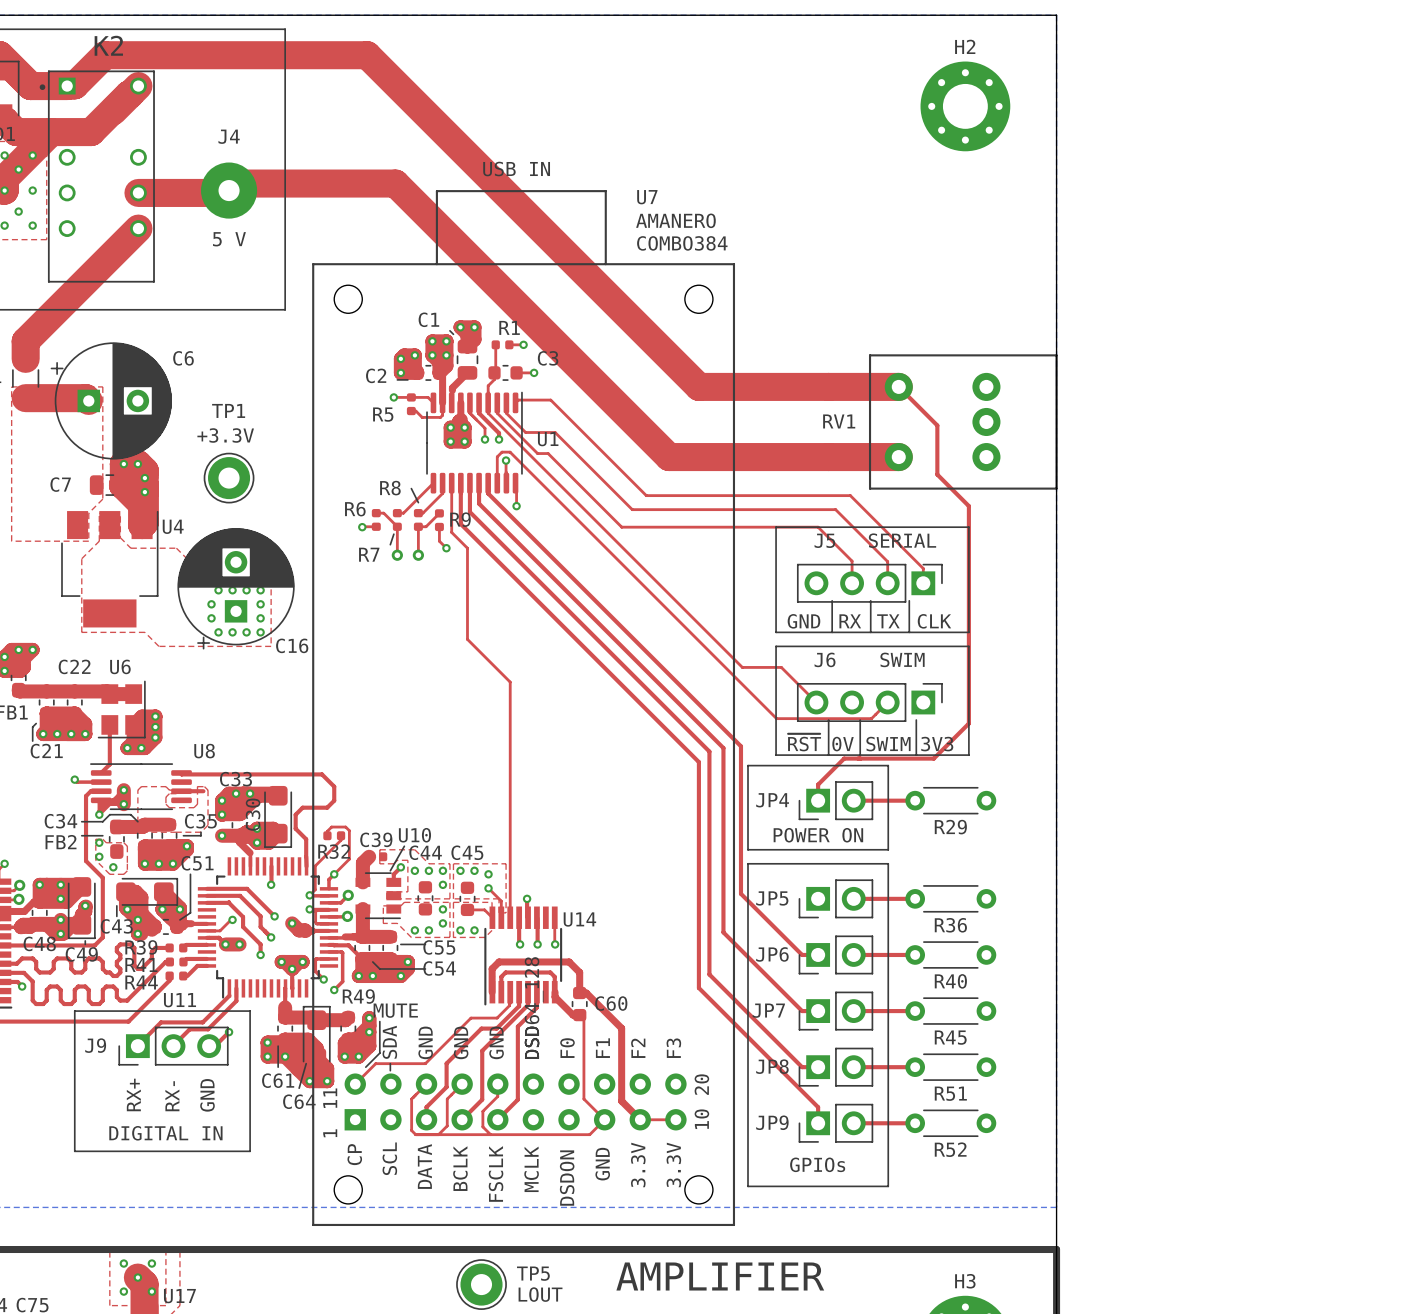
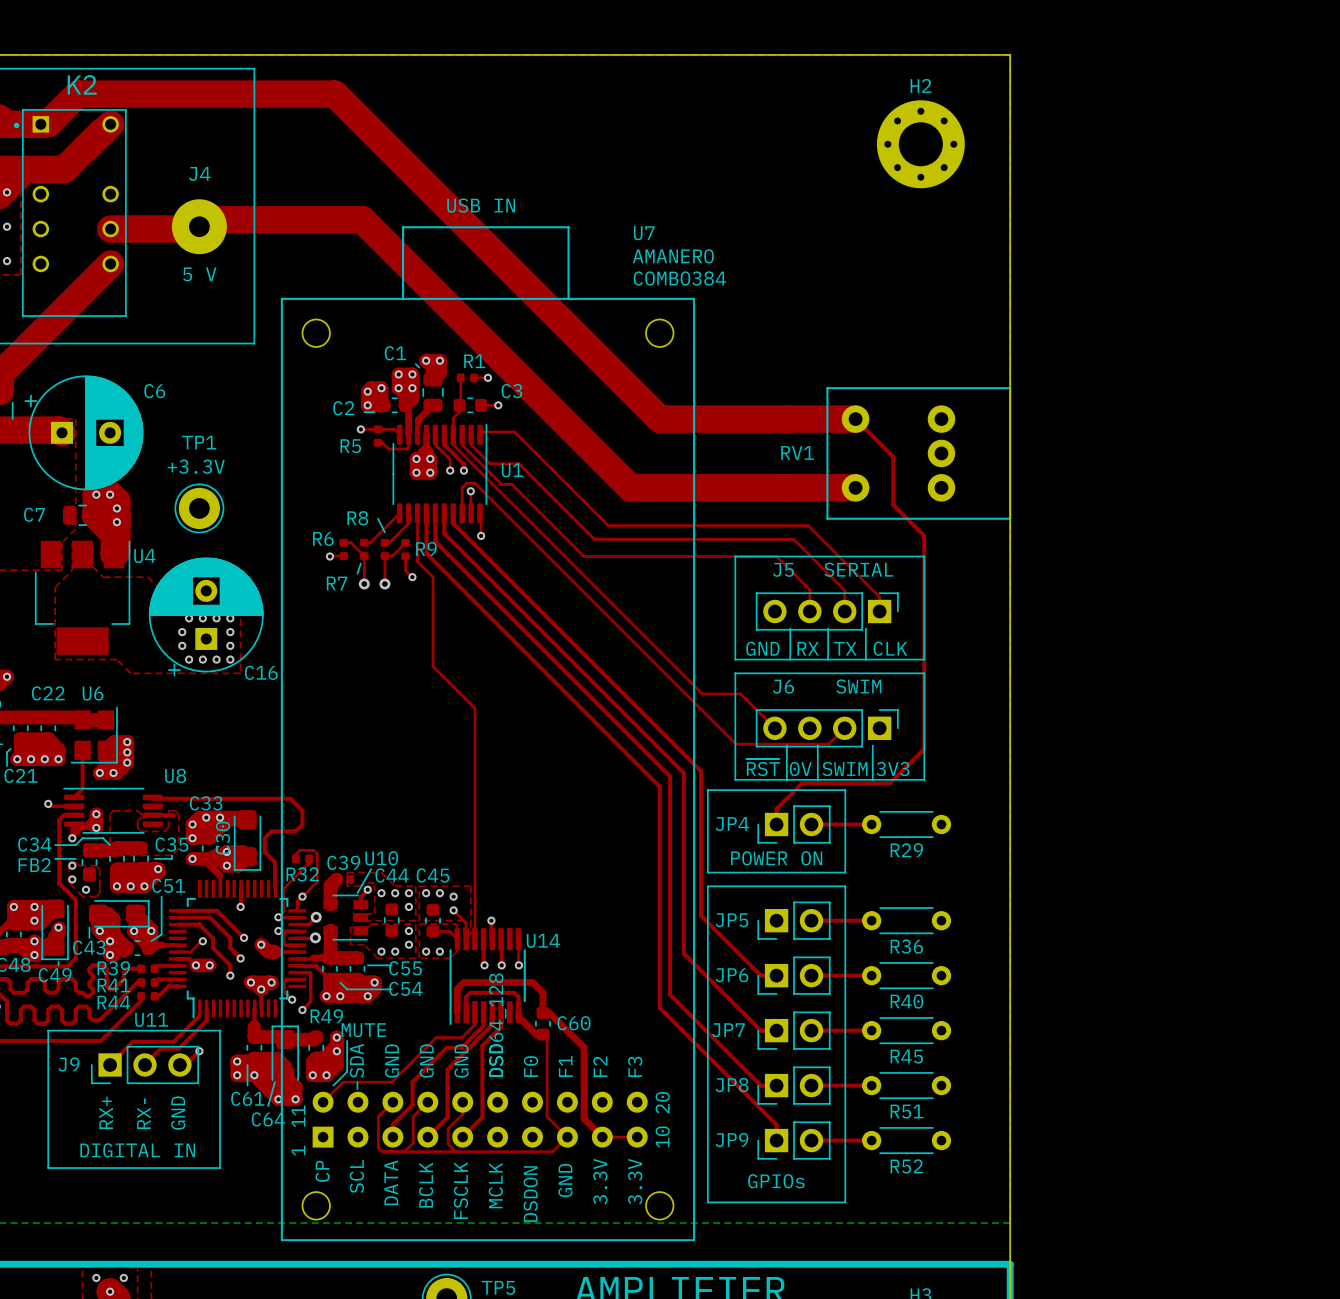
U7 name position: U7 (647, 197) -> U7 (644, 233)
text position: AMANERO (675, 220) -> AMANERO (673, 256)
text position: COMBO384 (682, 243) -> COMBO384 (679, 278)

